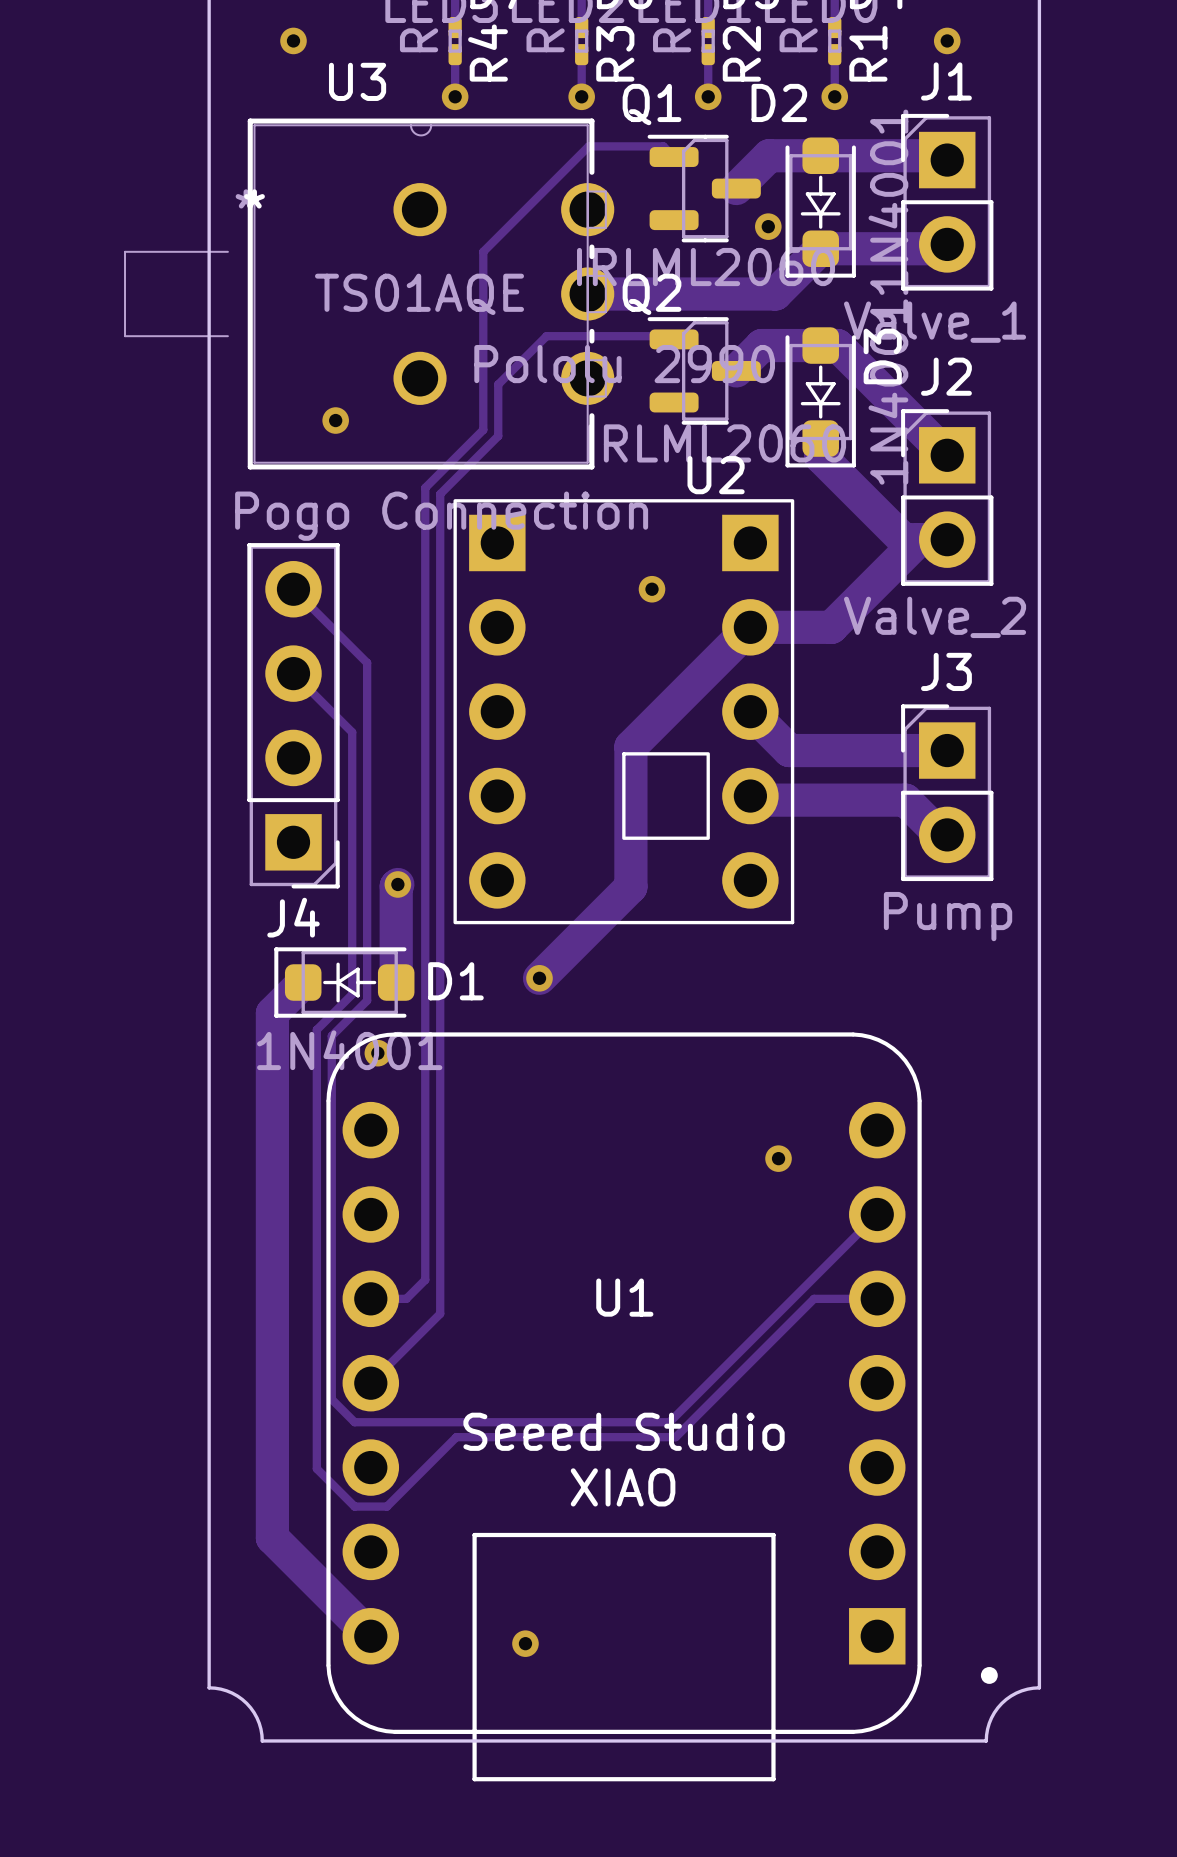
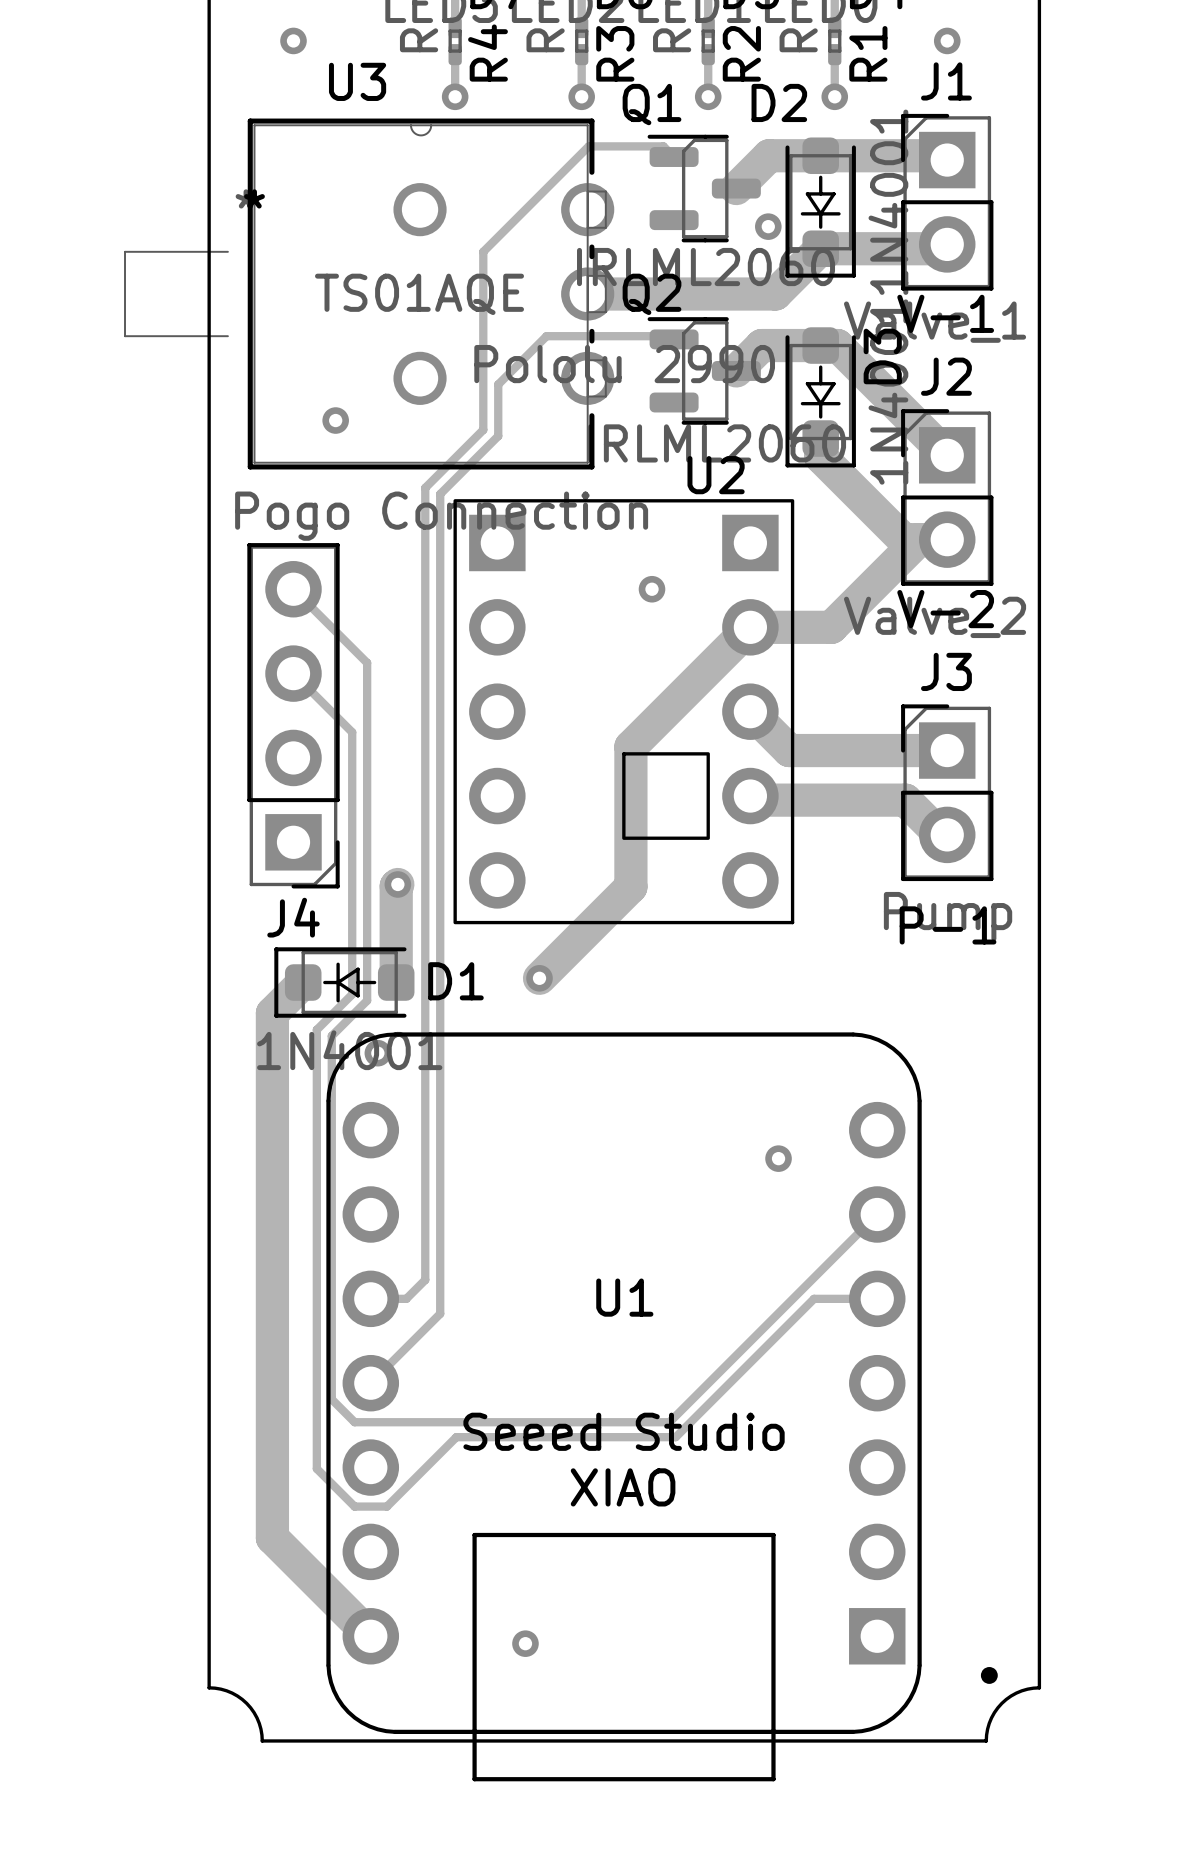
text: none -> V-1 (945, 313)
text: none -> V-2 (945, 609)
text: none -> P-1 (948, 925)

